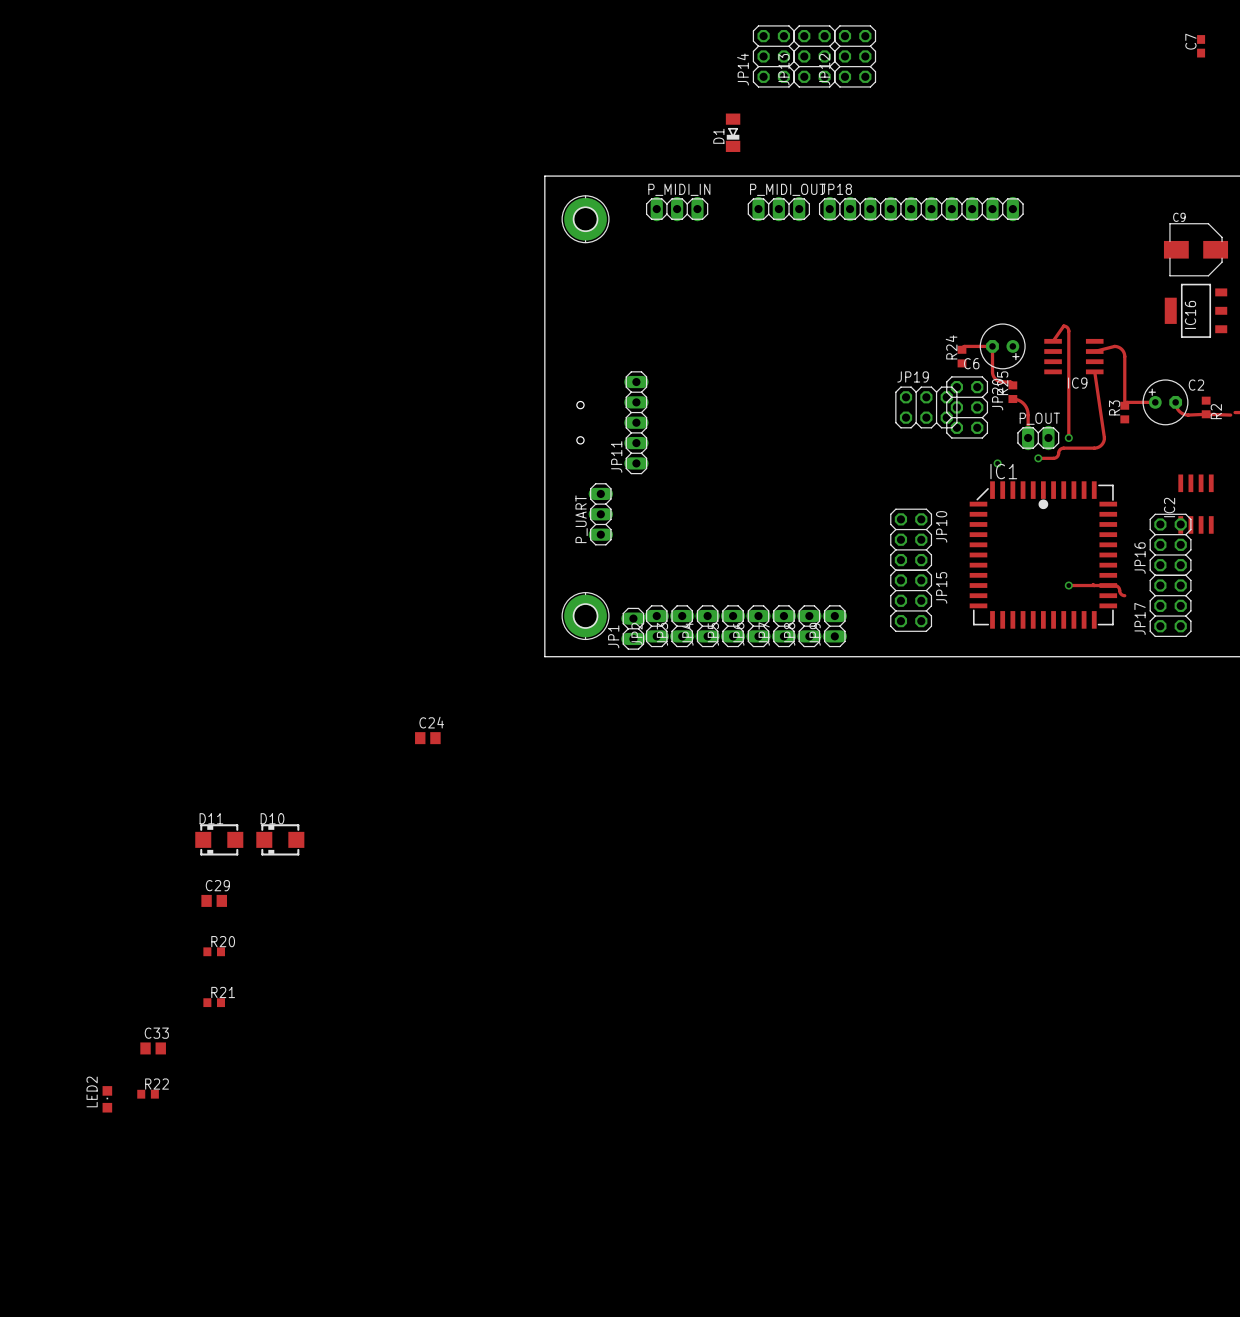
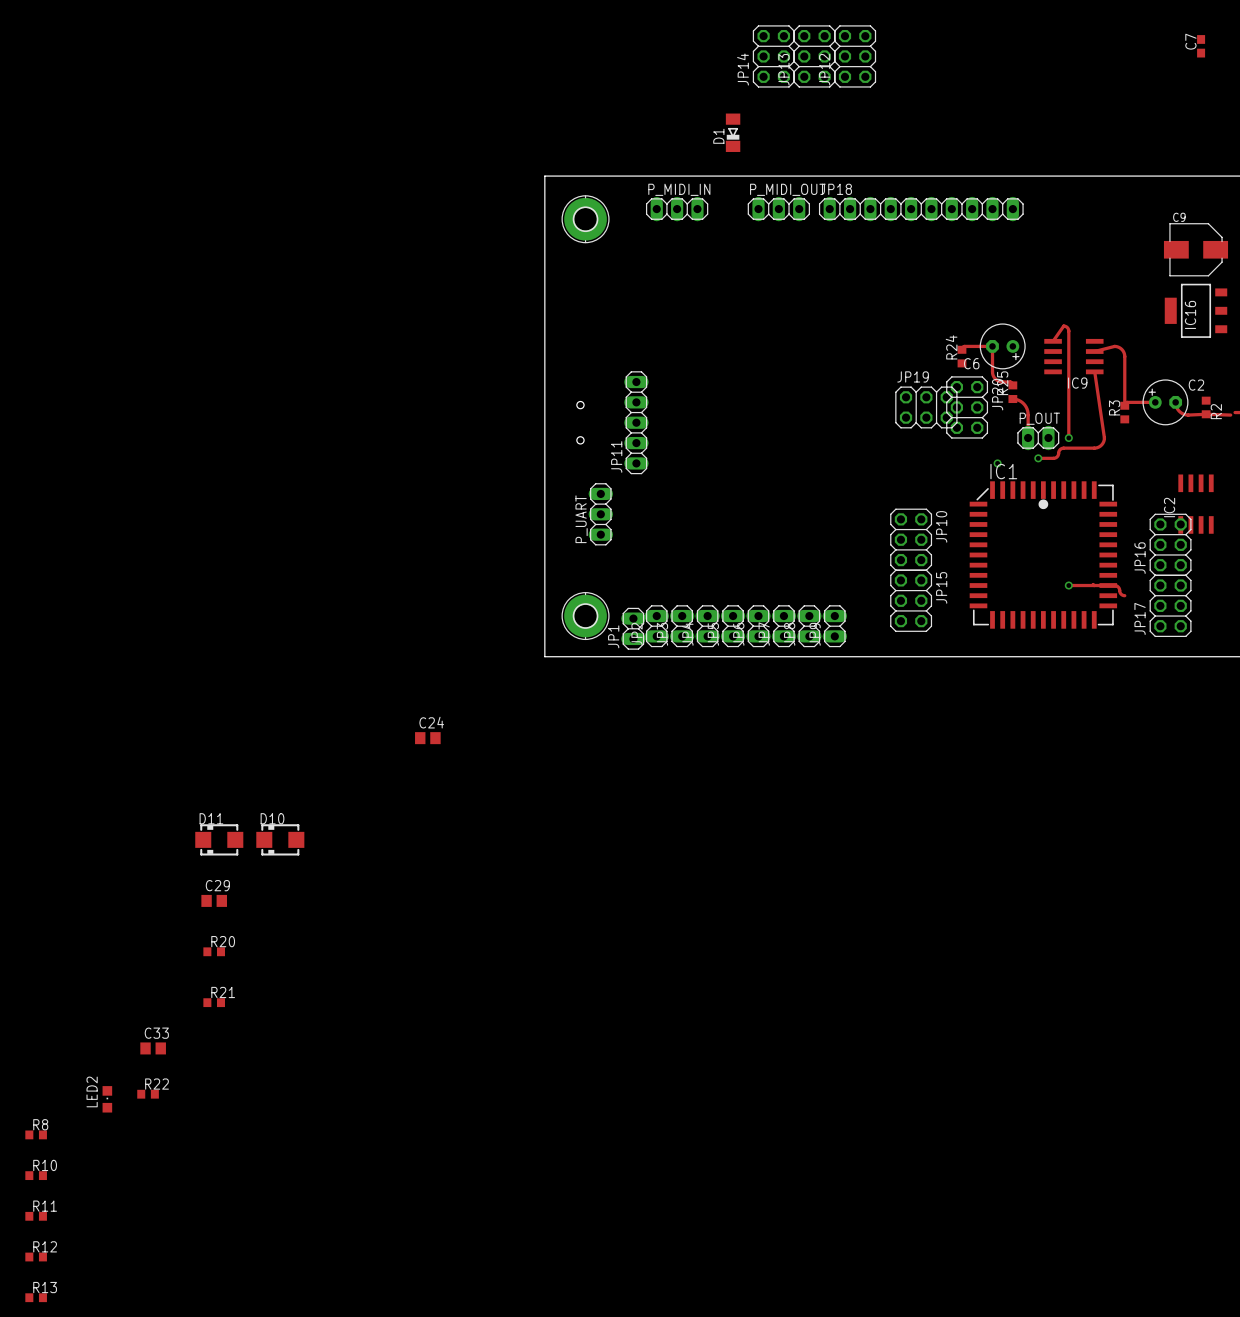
R8: none -> (36, 1134)
R10: none -> (36, 1175)
R11: none -> (36, 1216)
R12: none -> (36, 1257)
R13: none -> (36, 1297)

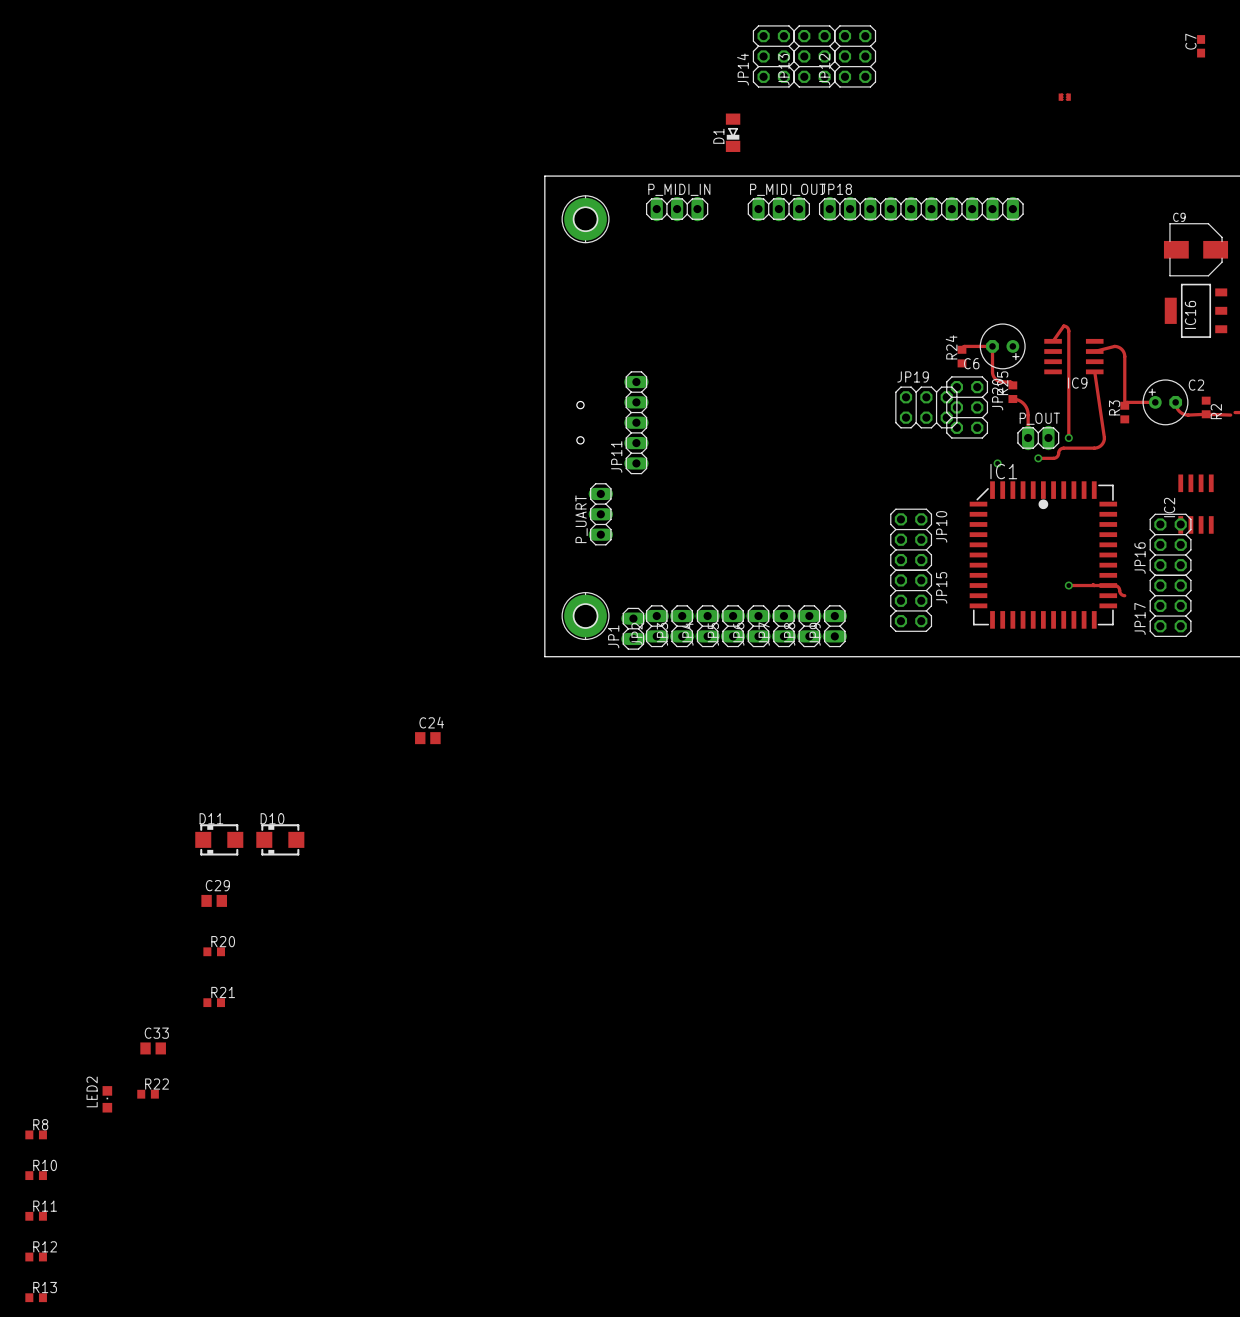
part: none -> (1064, 97)

